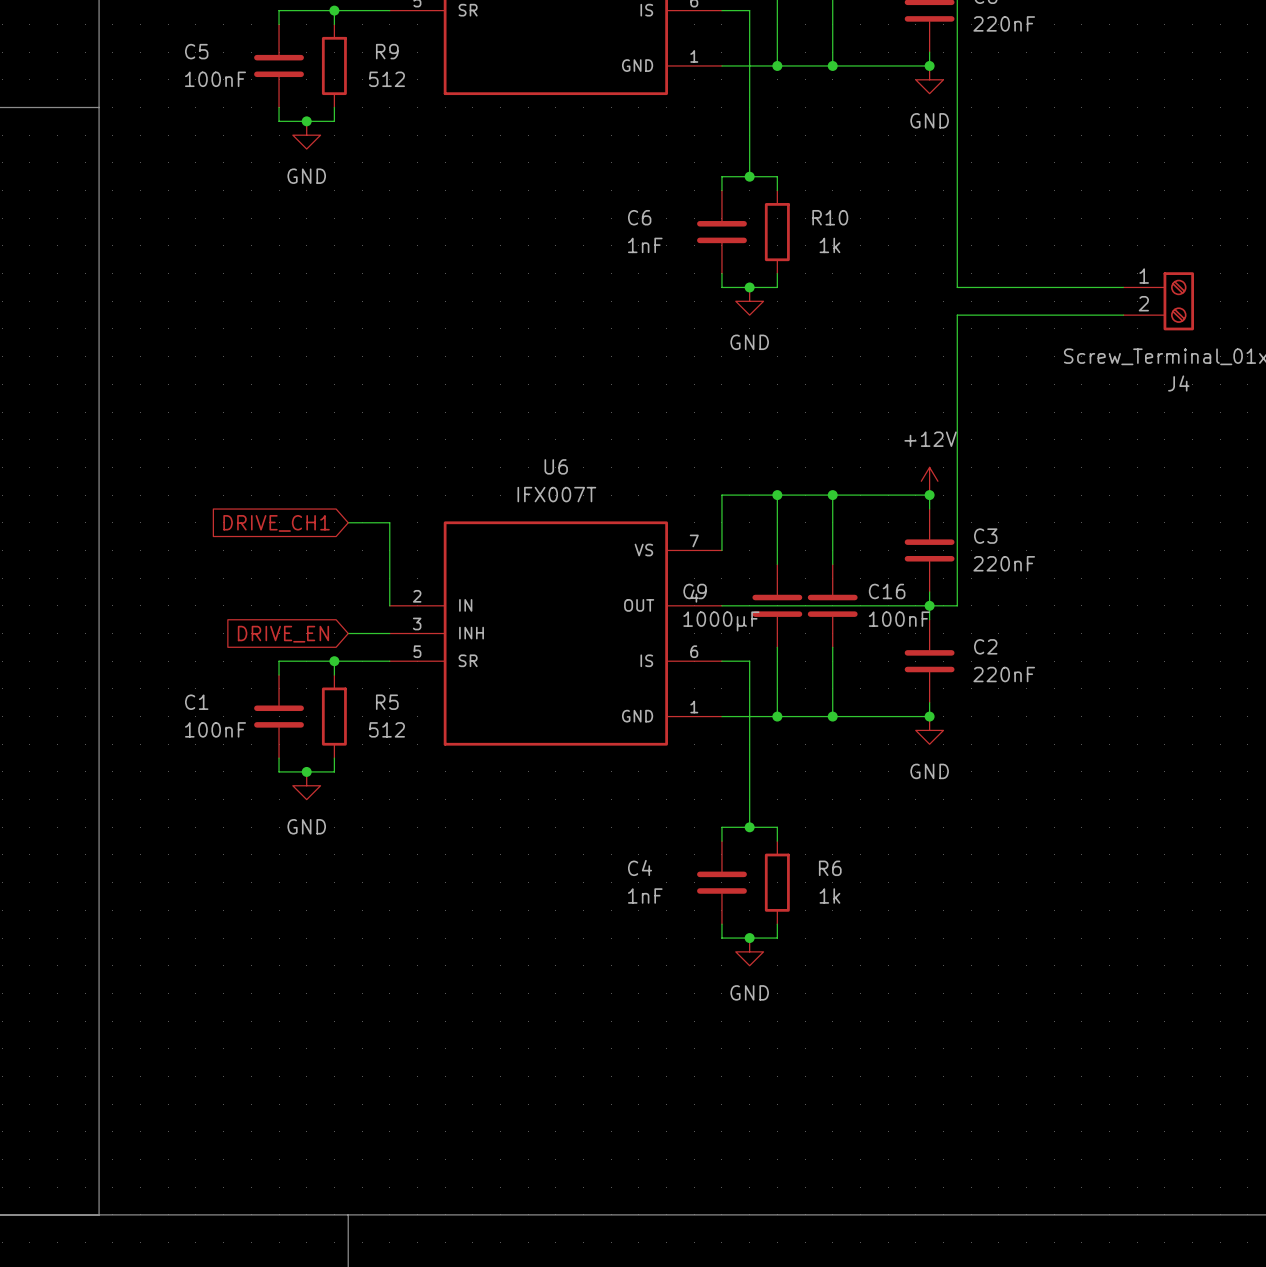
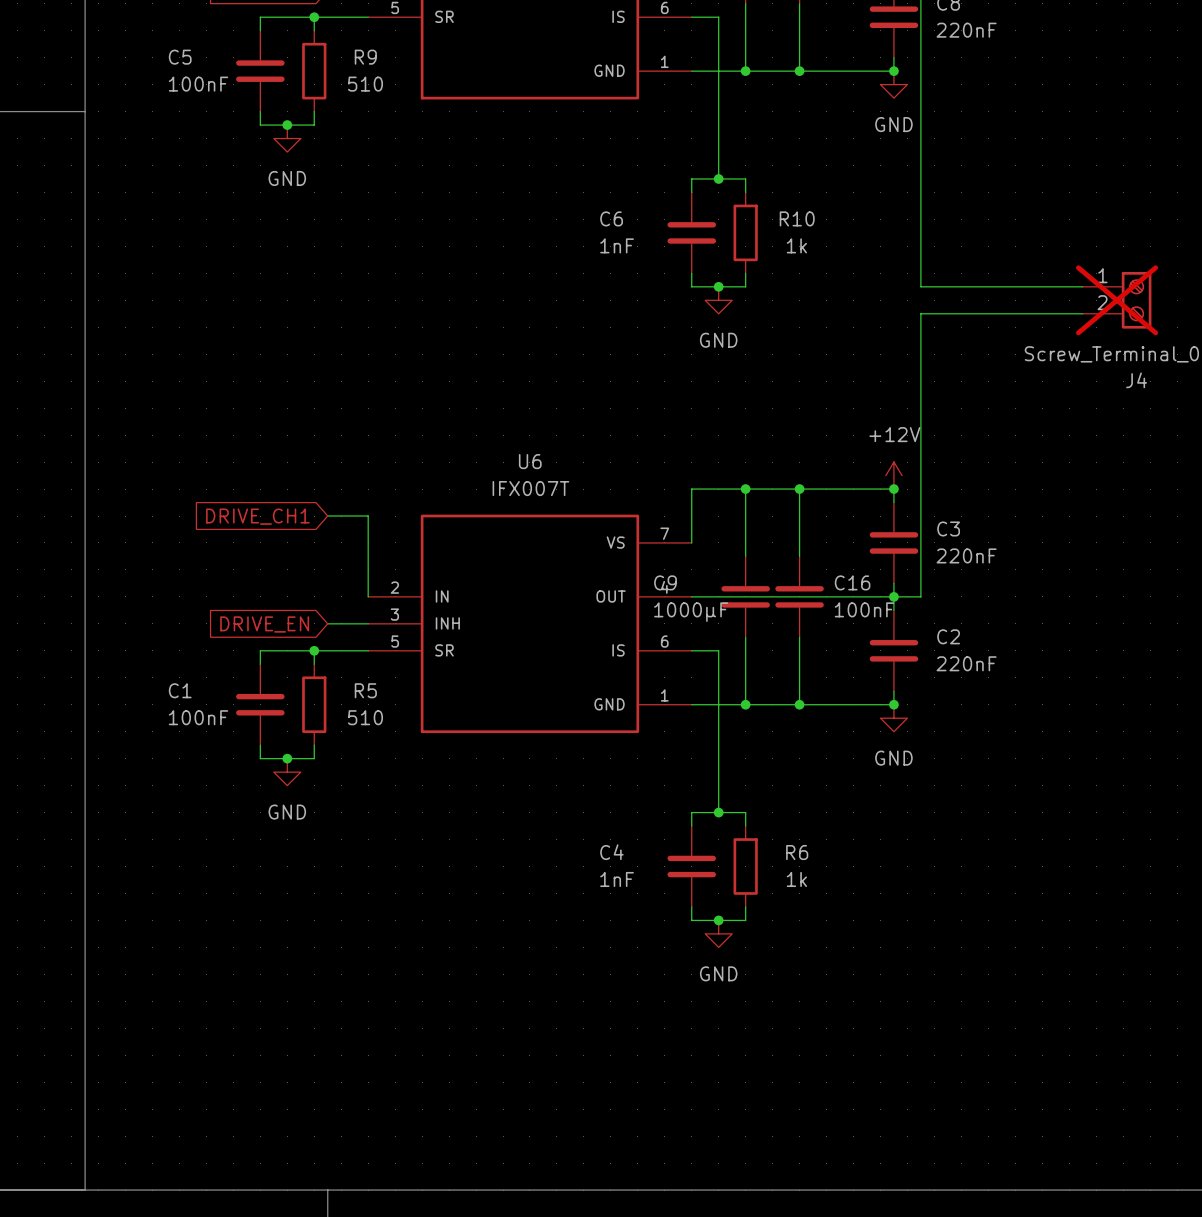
R9 value: 512 (386, 79) -> 510 (365, 84)
J4 do-not-place cross: none -> (1117, 300)
R5 value: 512 (386, 729) -> 510 (365, 717)

